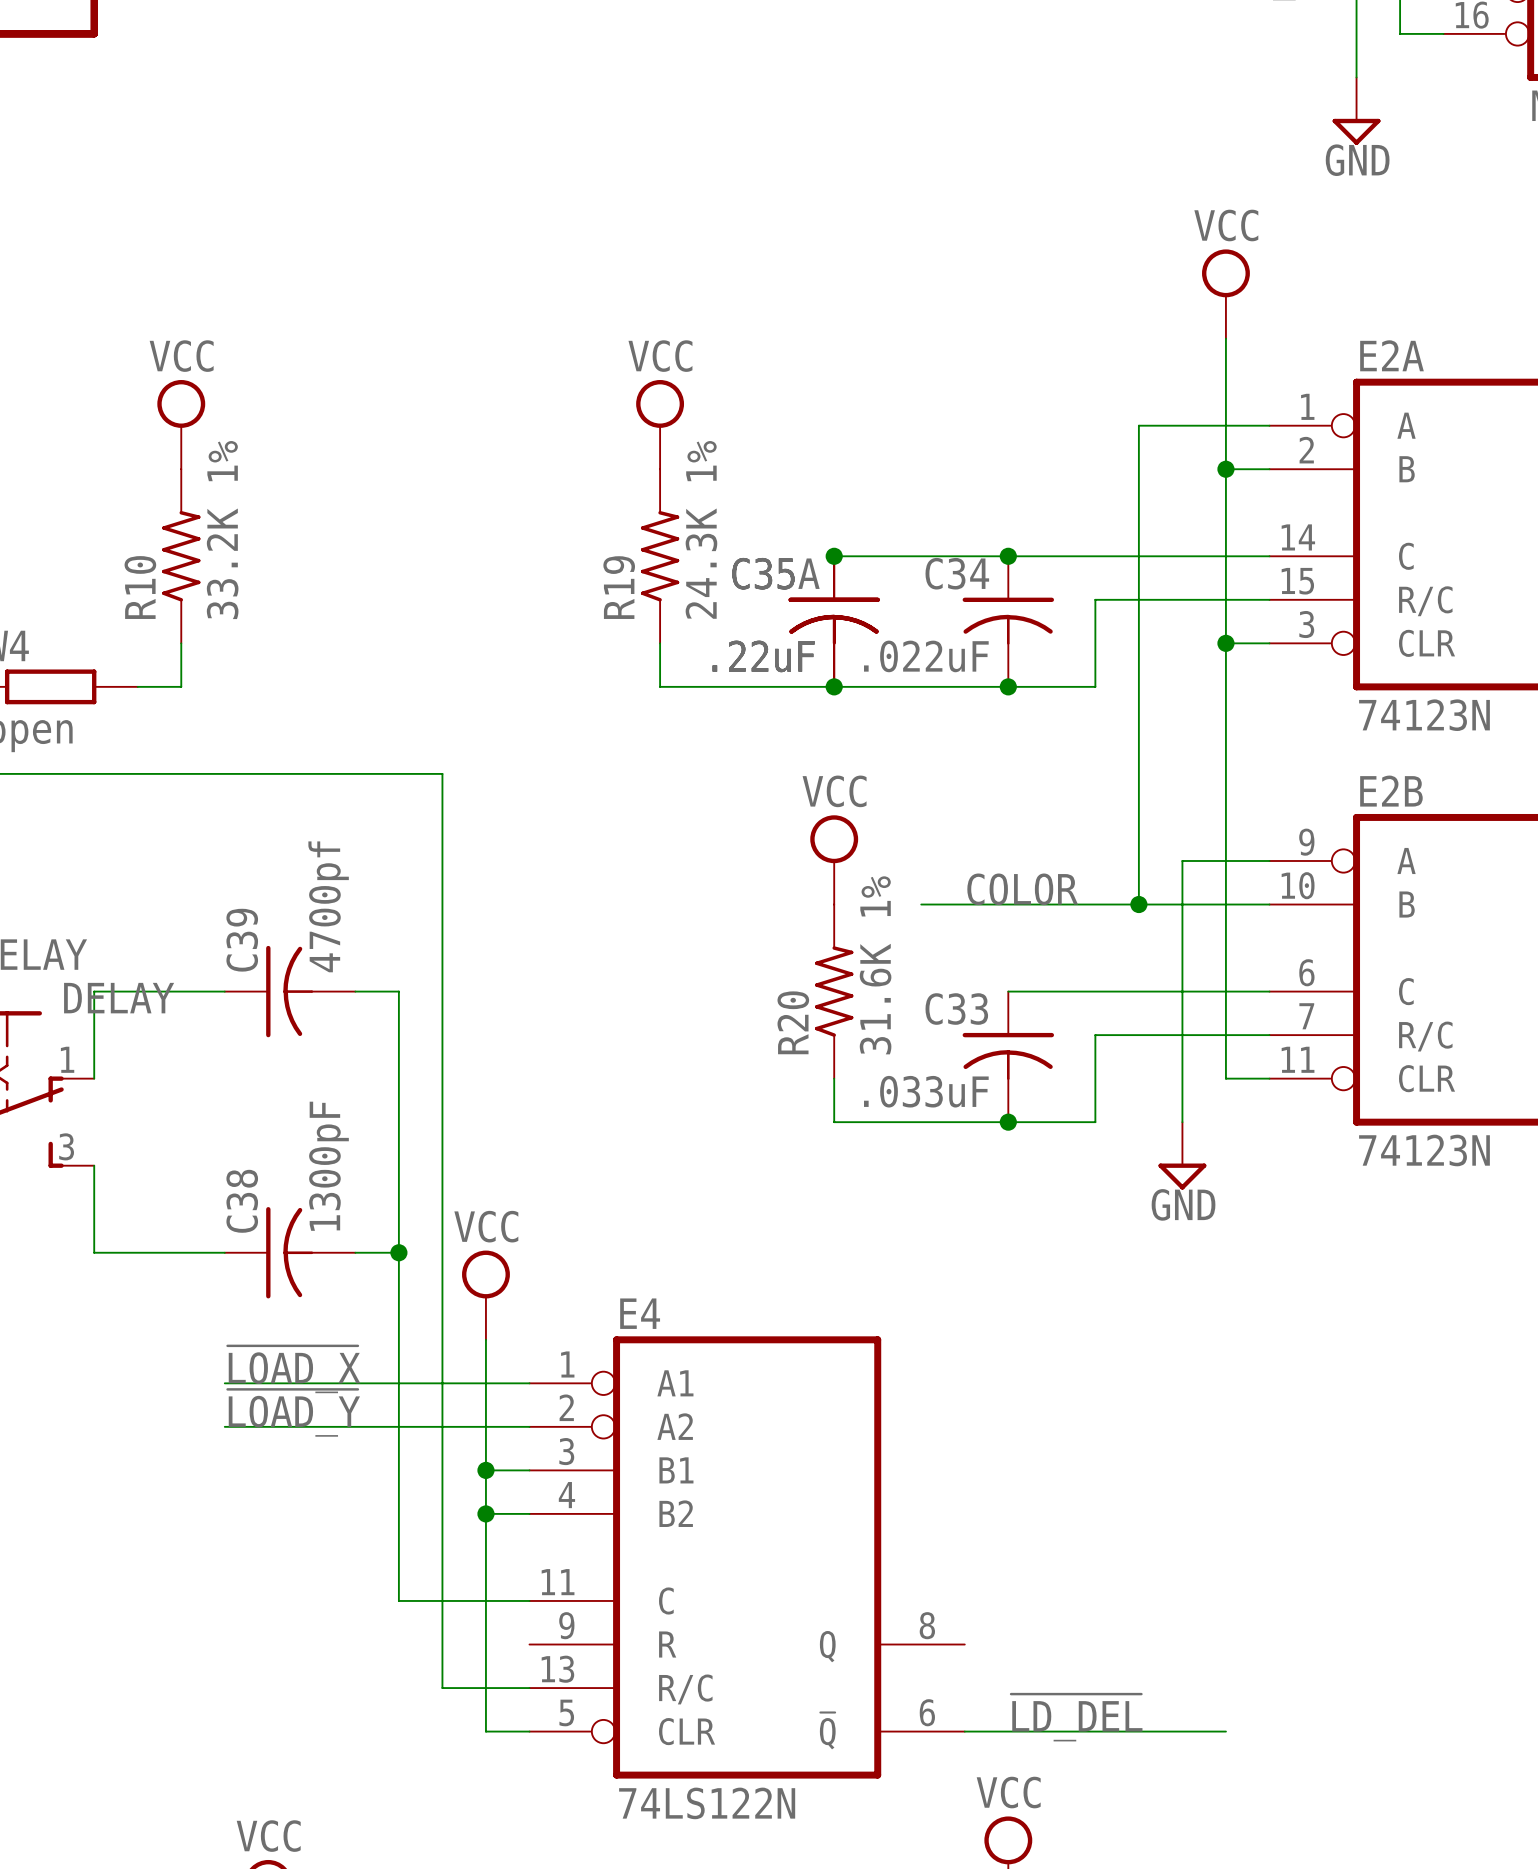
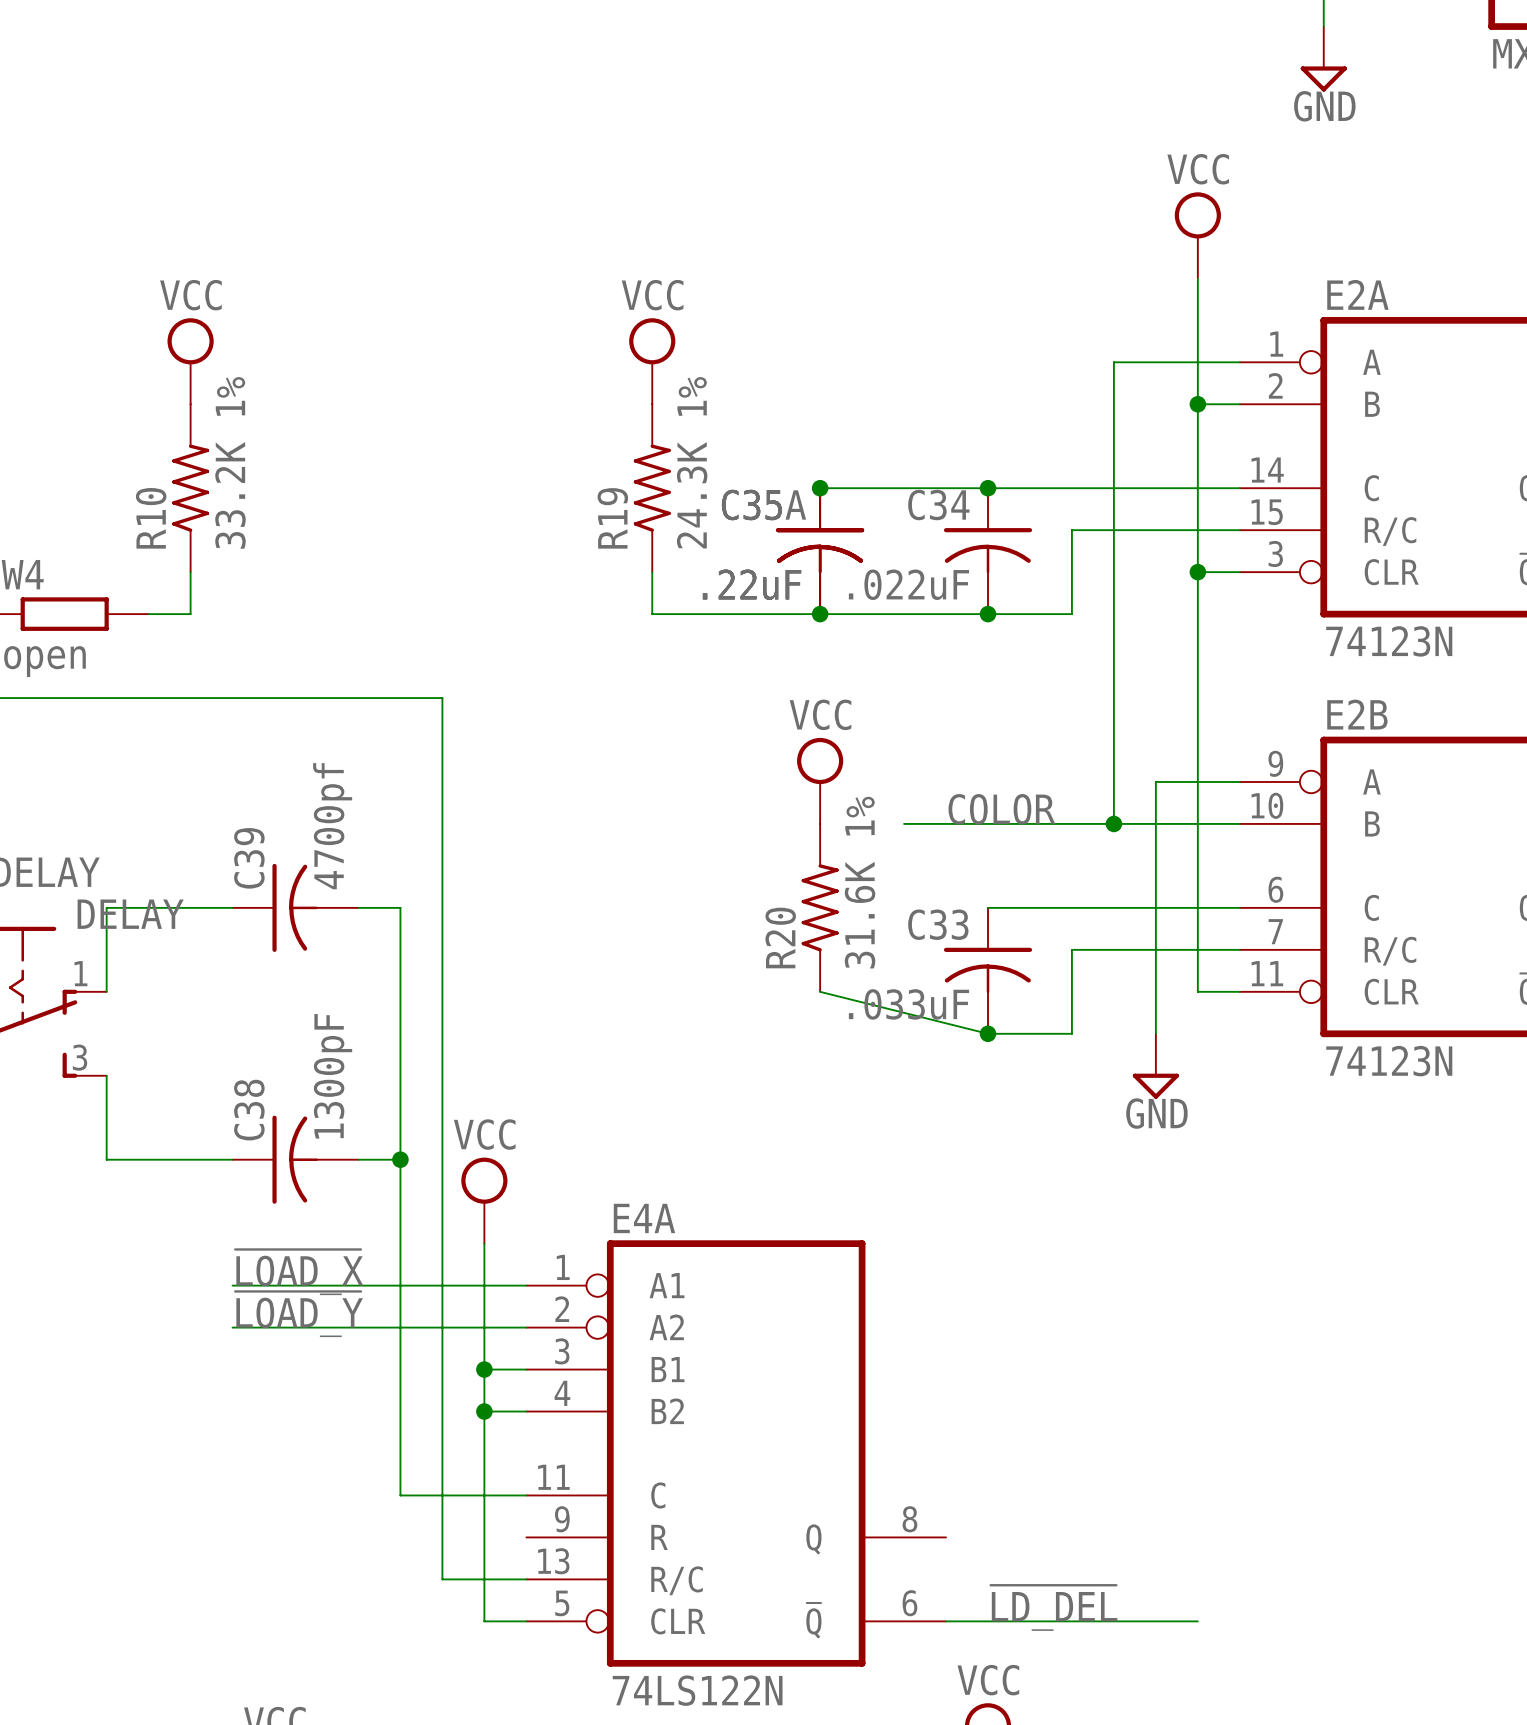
wire: (834, 1078) (834, 1122) (1008, 1122) -> (820, 991) (988, 1033)
E4 name: E4 (640, 1313) -> E4A (644, 1218)

